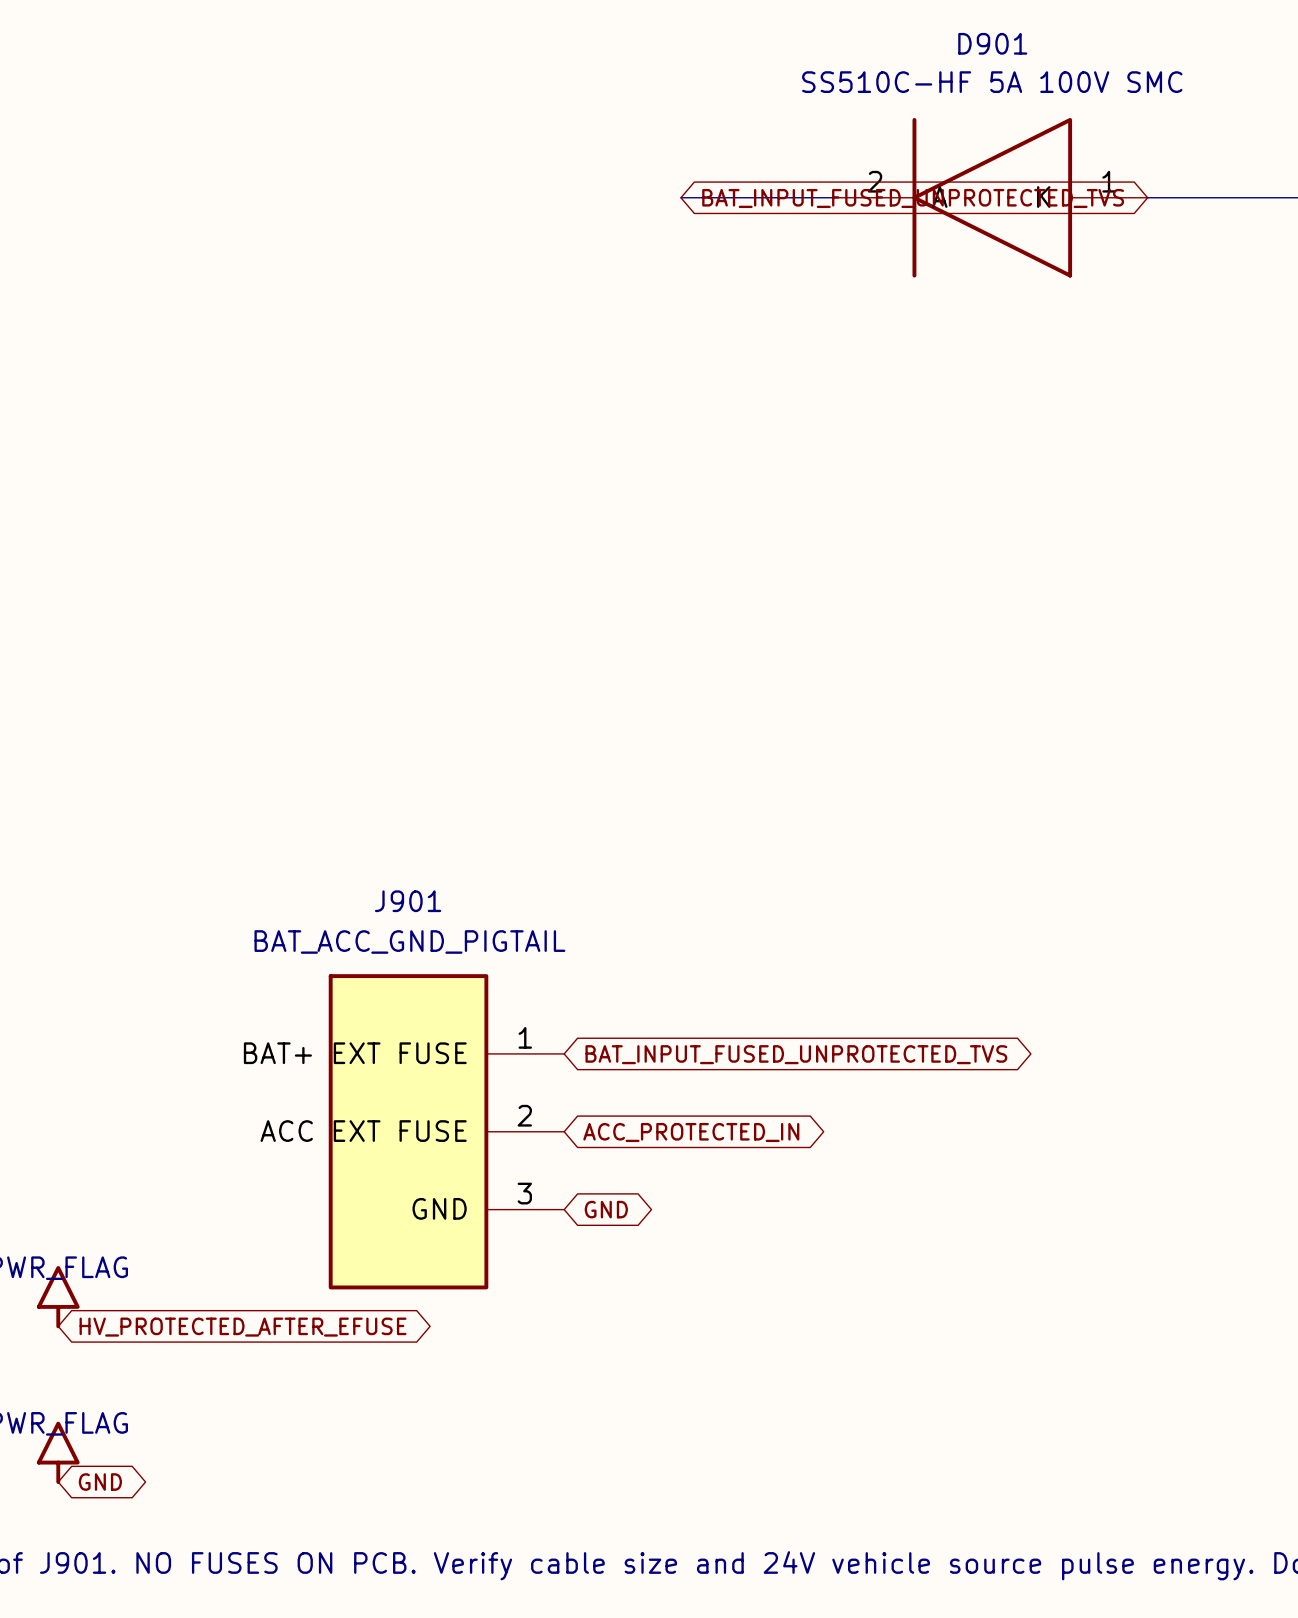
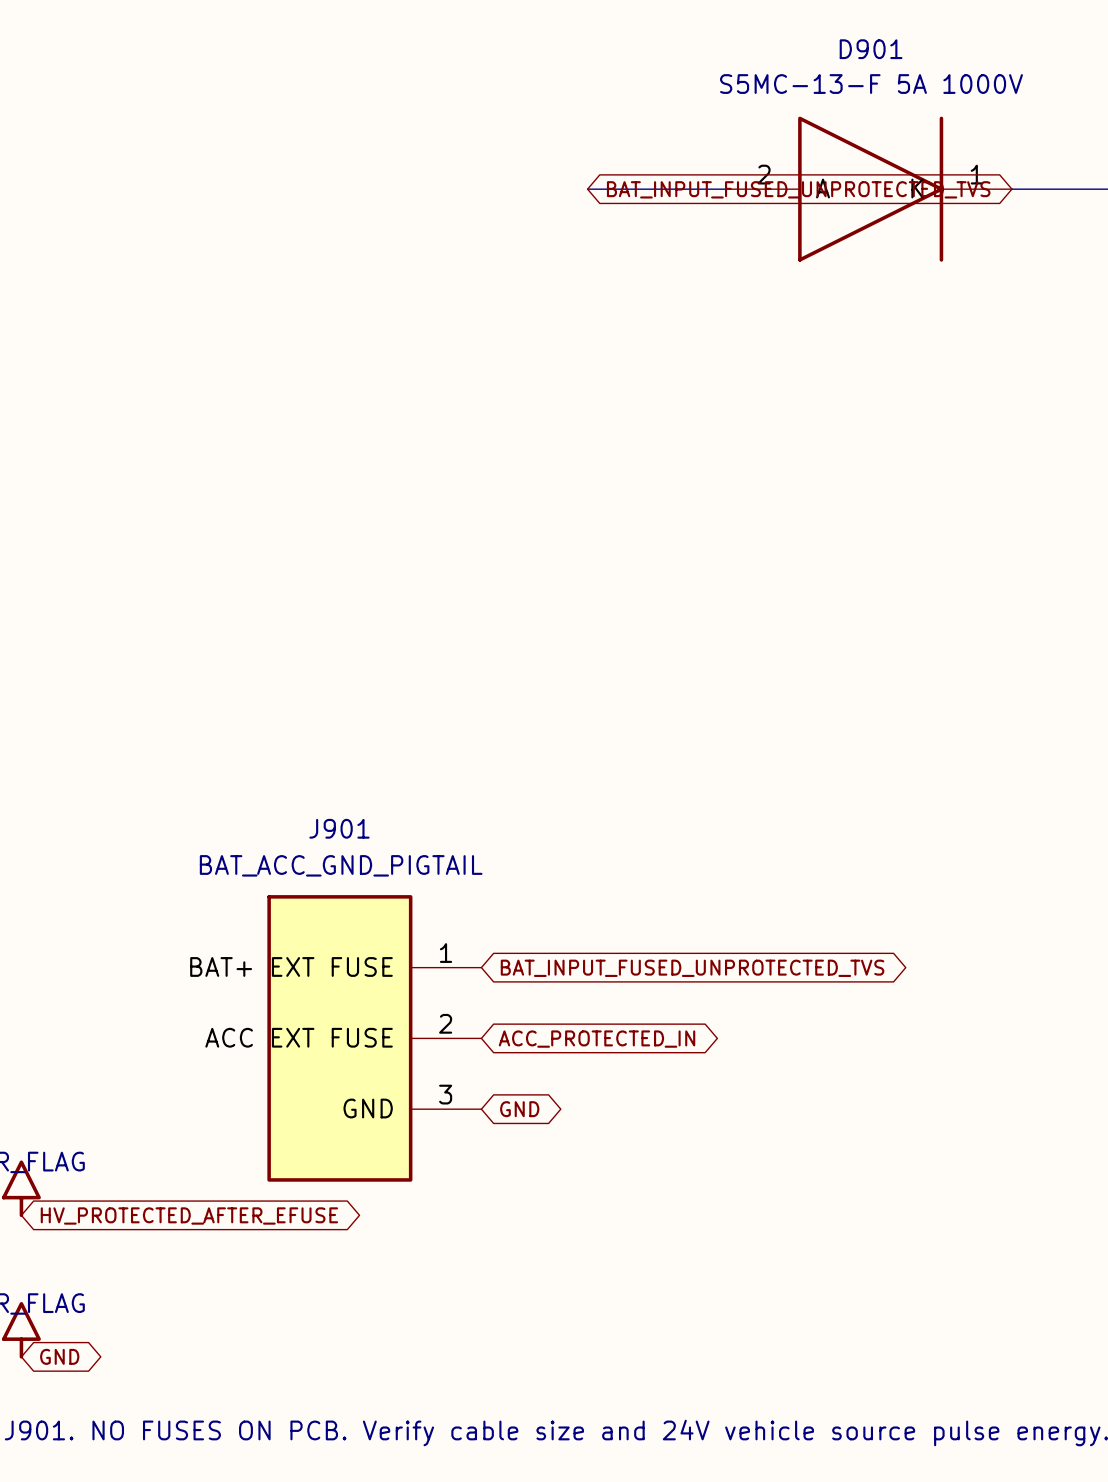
D901 value: SS510C-HF 5A 100V SMC (992, 82) -> S5MC-13-F 5A 1000V (871, 84)
D901 symbol: [836, 117, 1148, 278] -> [729, 116, 1013, 262]

